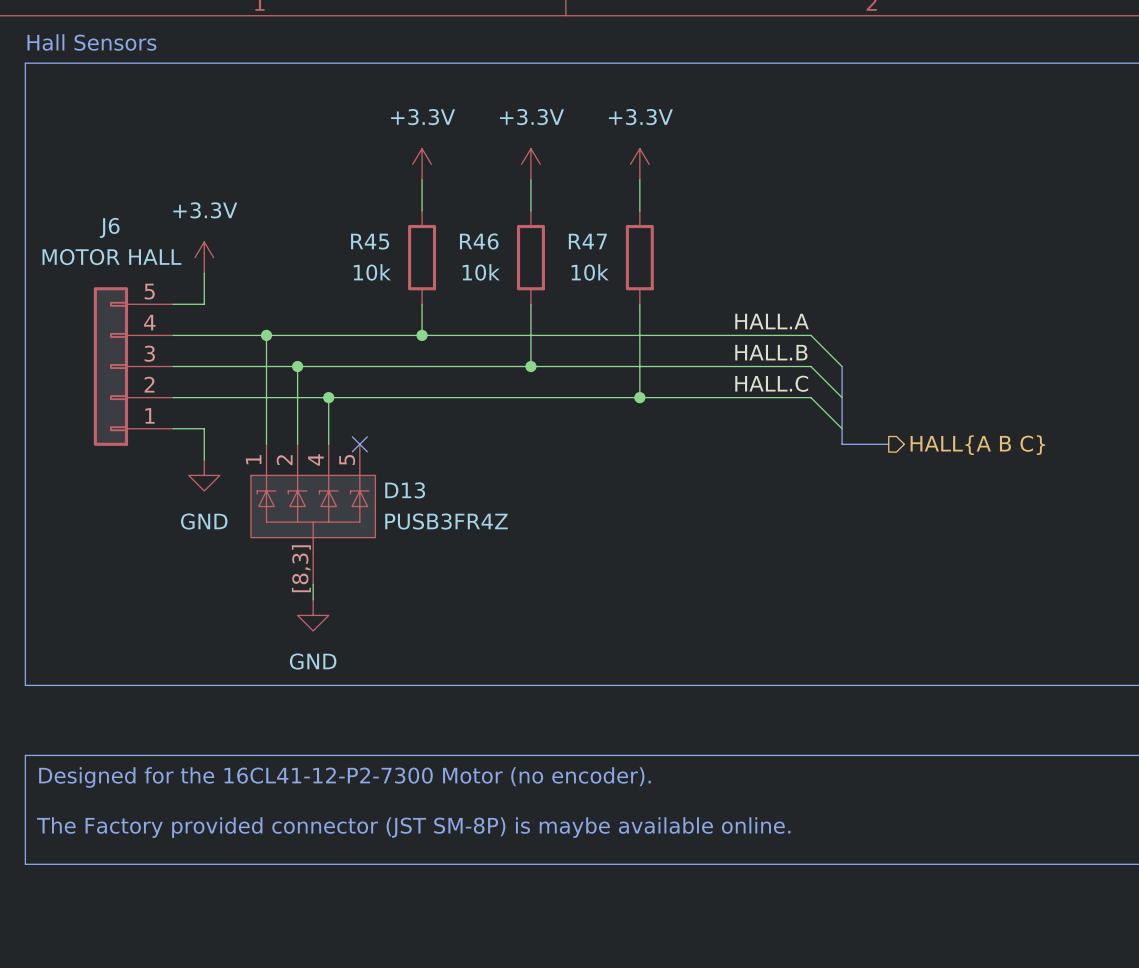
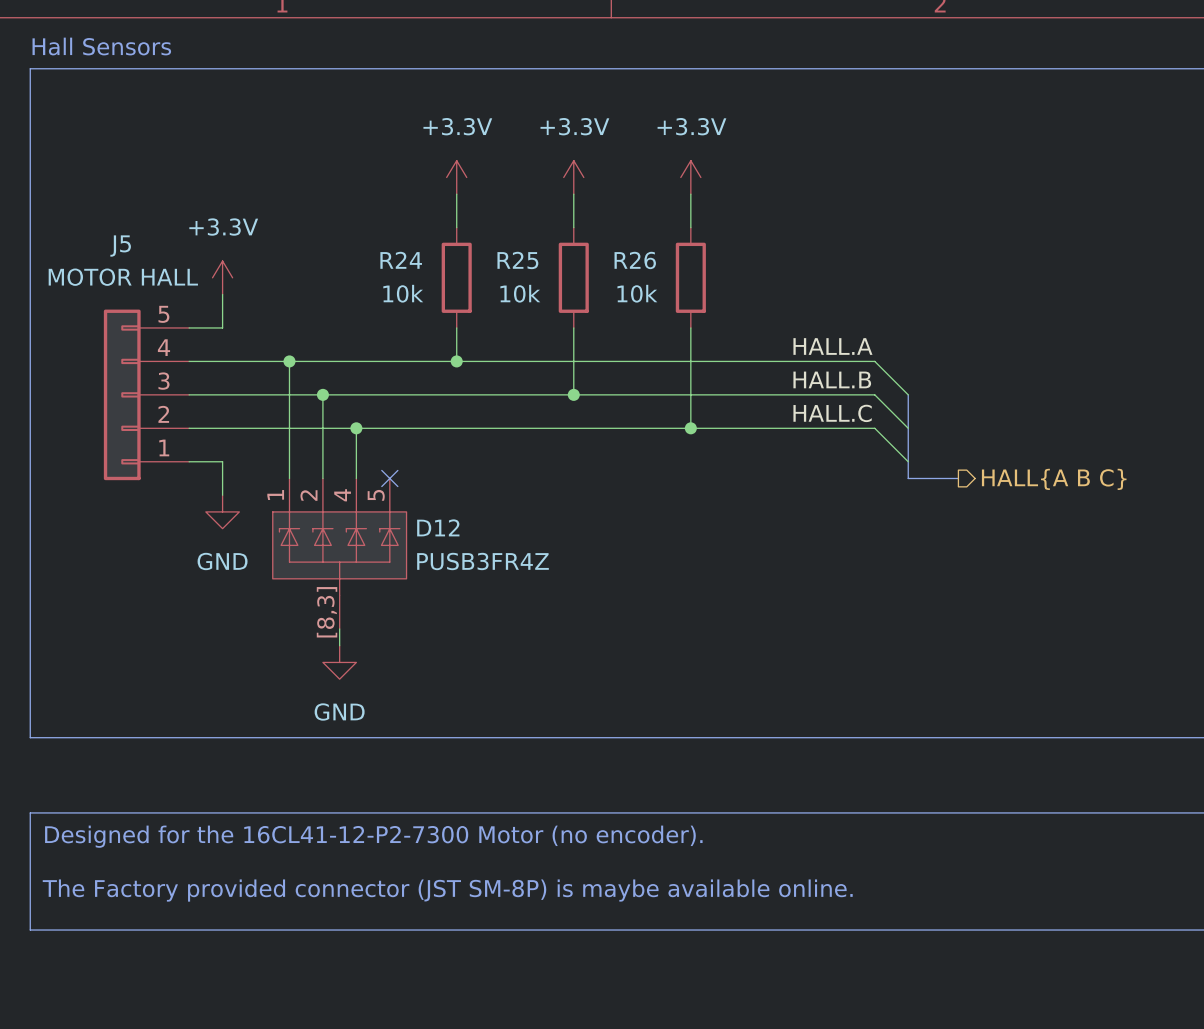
J6 name: J6 (109, 227) -> J5 (120, 246)
R45 name: R45 (370, 241) -> R24 (401, 260)
R46 name: R46 (479, 241) -> R25 (517, 260)
R47 name: R47 (587, 241) -> R26 (635, 260)
D13 name: D13 (405, 490) -> D12 (438, 527)

